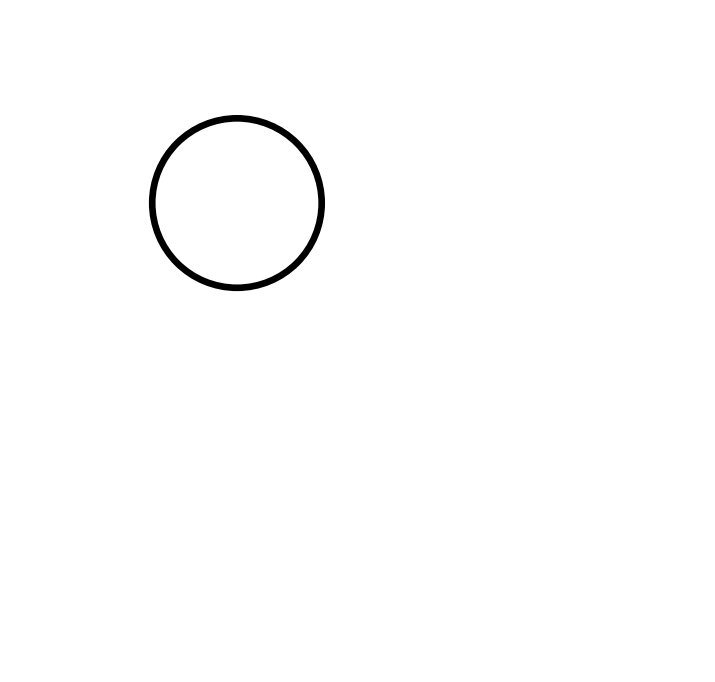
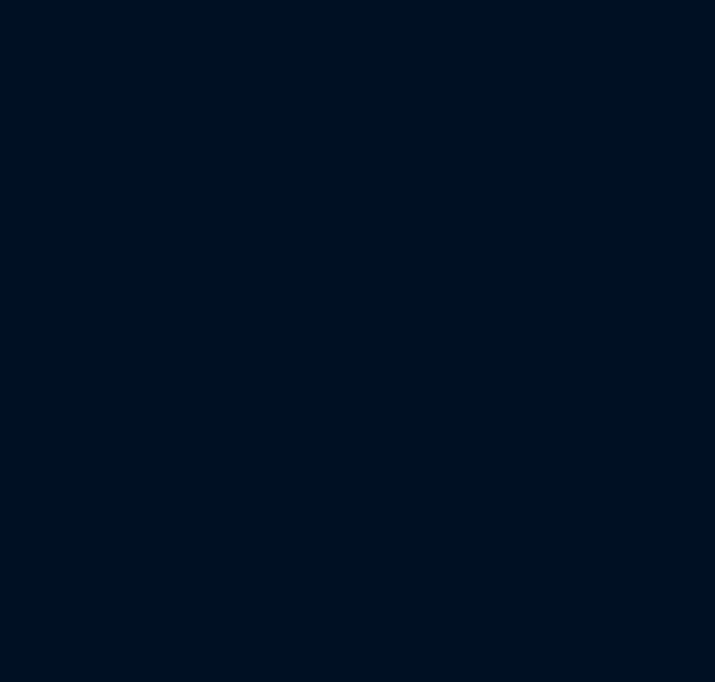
round board edge: [148, 114, 326, 292] -> none

